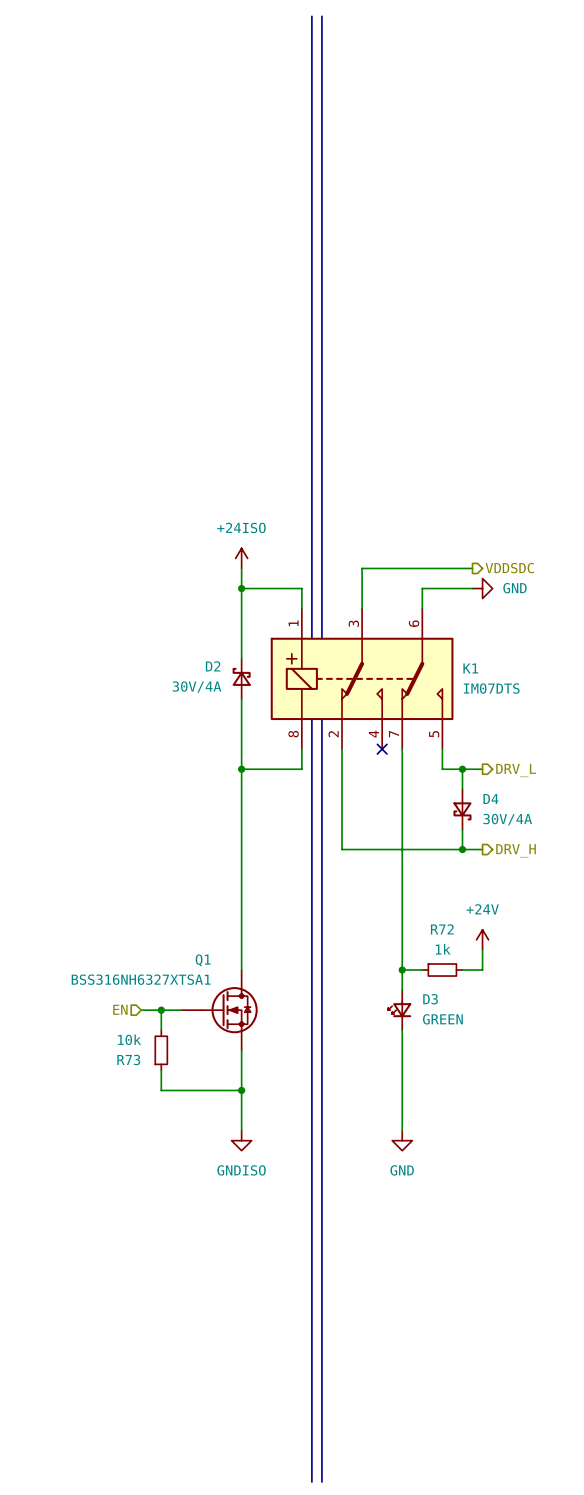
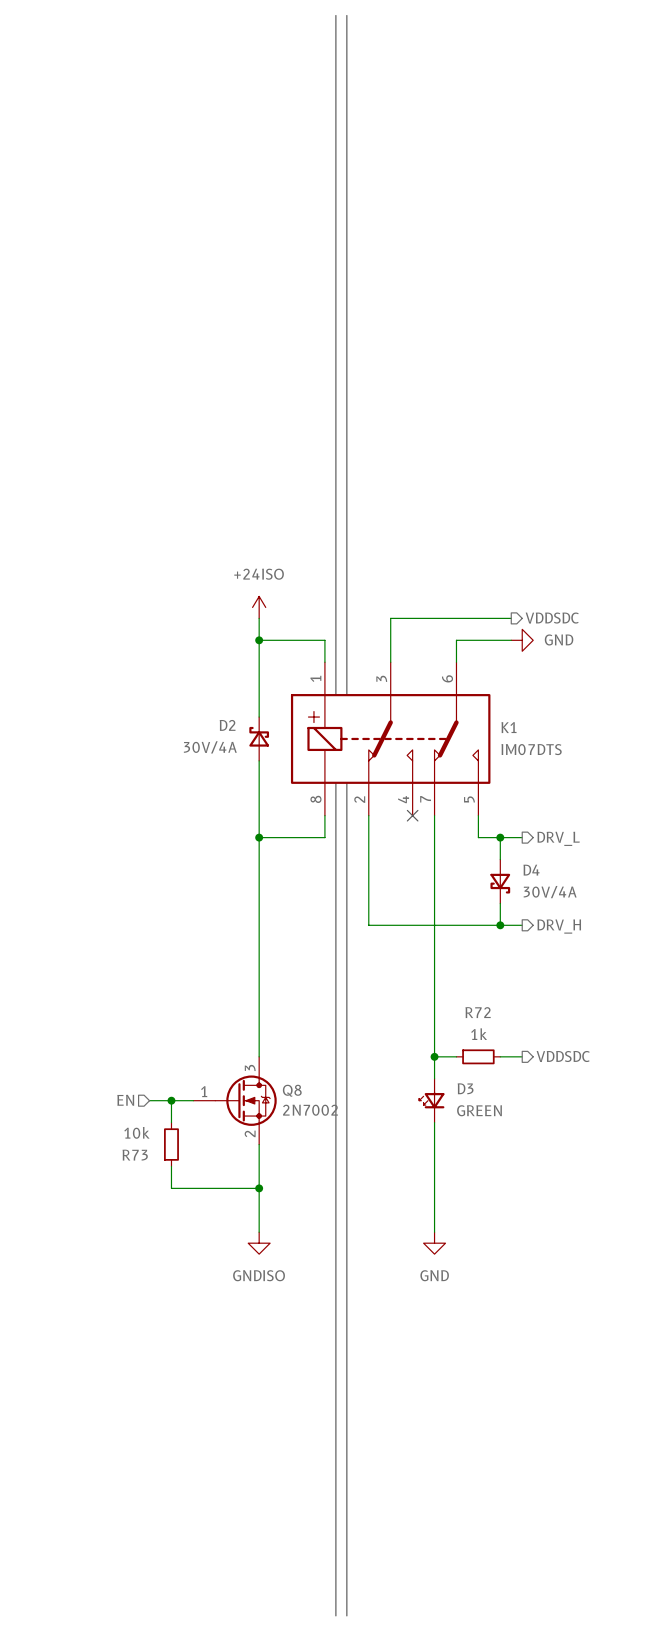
power symbol: +24V (482, 939) -> none
wire: (482, 949) (482, 970) -> none
hierarchical label: none -> VDDSDC (563, 1056)
Q1: BSS316NH6327XTSA1 (219, 1010) -> none
Q8: none -> 2N7002 (235, 1100)

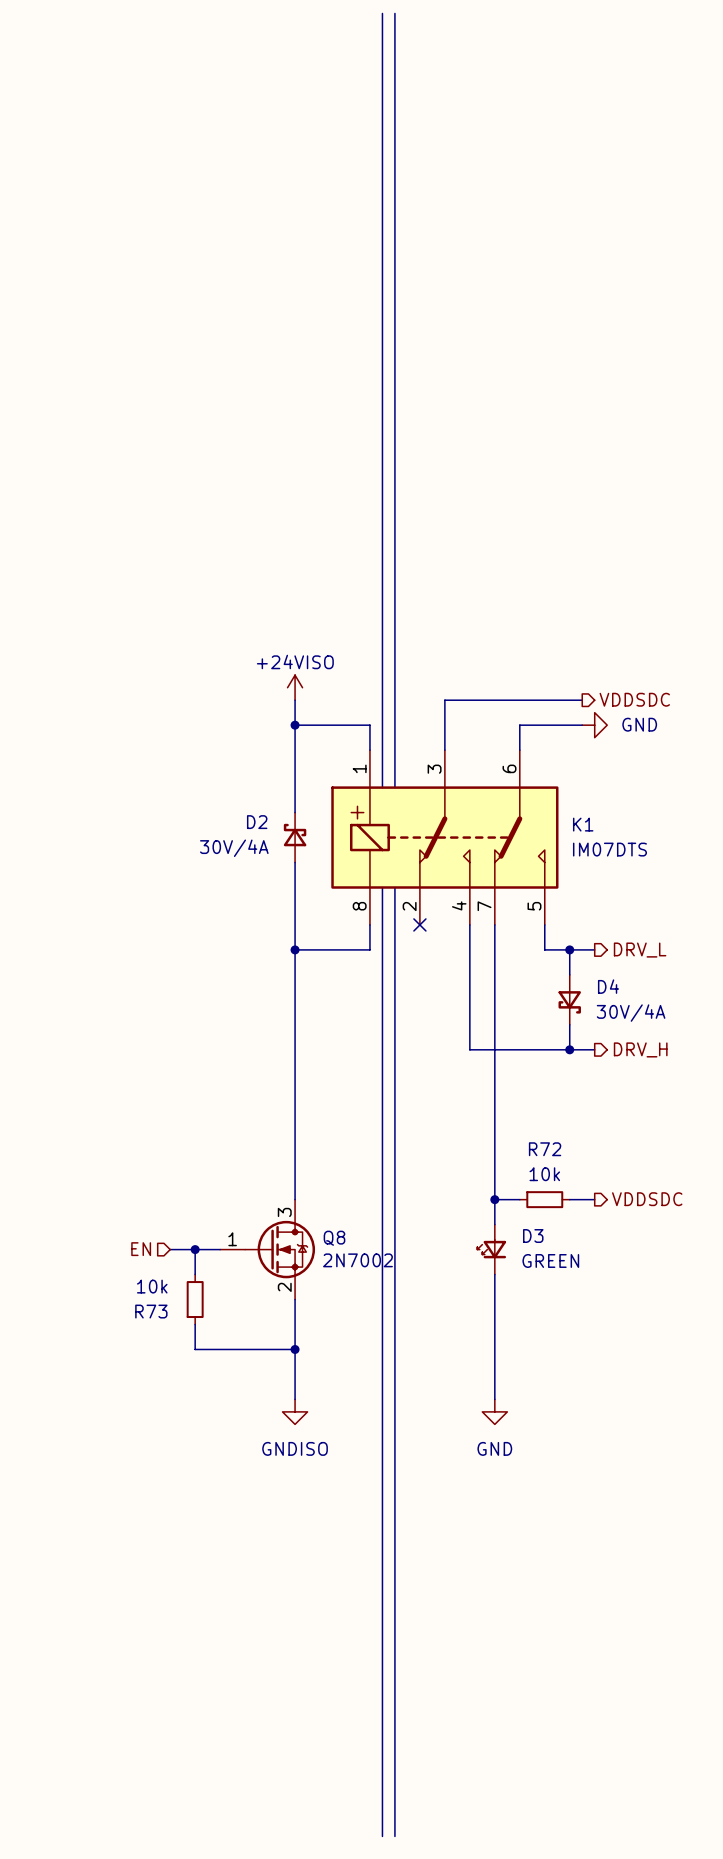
power symbol: +24ISO (259, 607) -> +24VISO (295, 687)
wire: (368, 815) (368, 925) (412, 925) -> (469, 924) (469, 1049)
no-connect mark position: (412, 815) -> (419, 924)
R72 value: 1k (479, 1034) -> 10k (544, 1174)

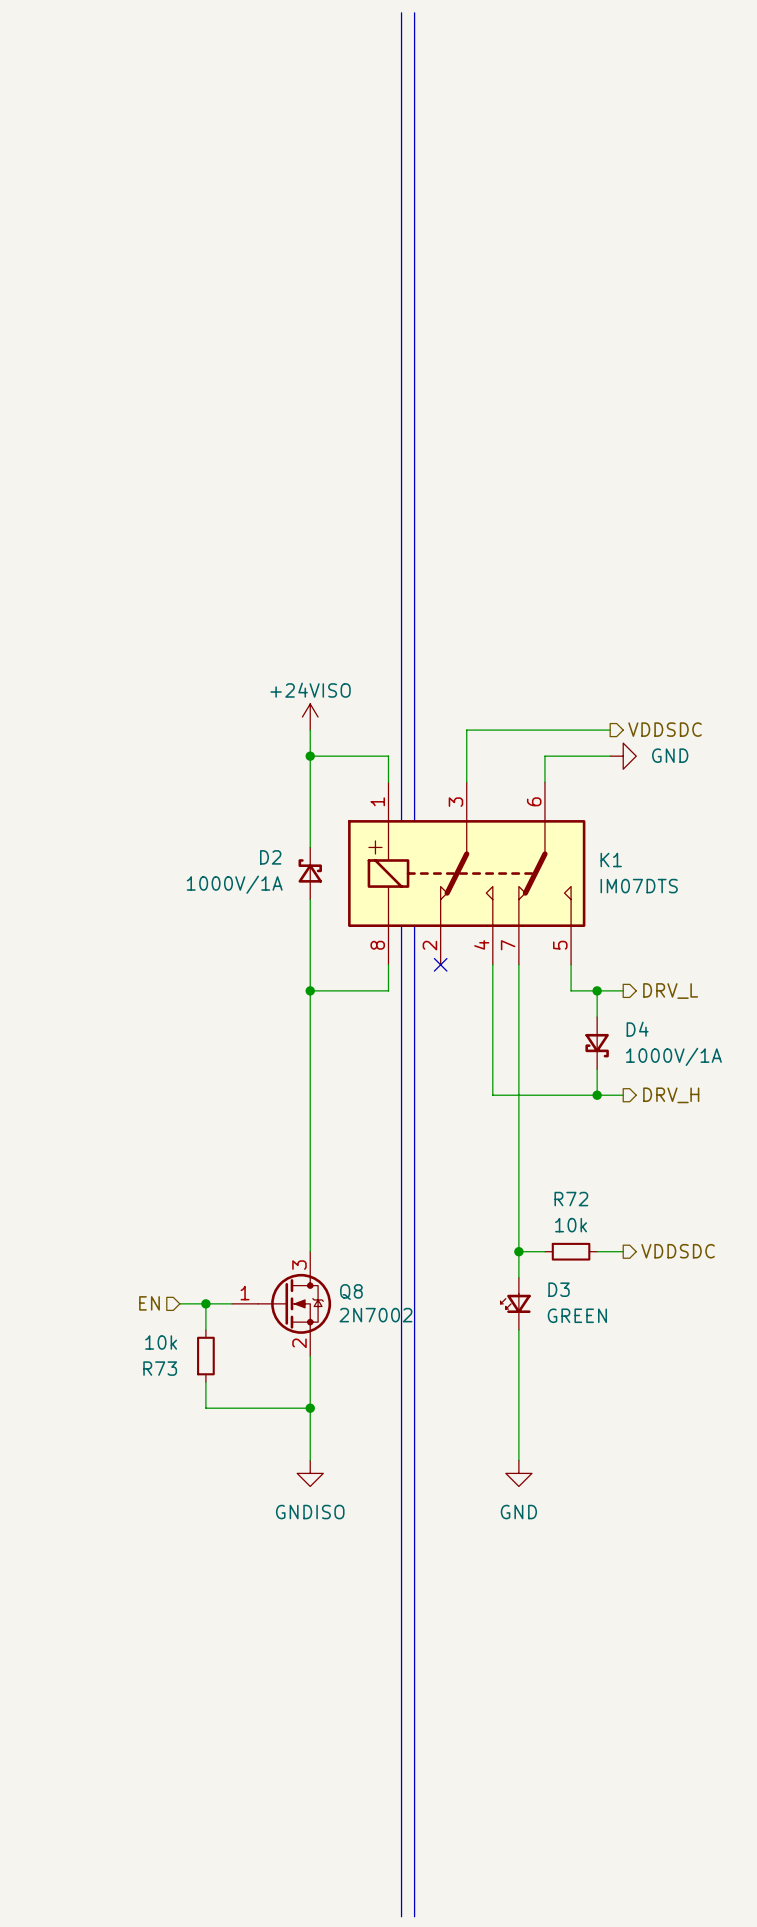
D2 value: 30V/4A (234, 848) -> 1000V/1A (234, 884)
D4 value: 30V/4A (631, 1013) -> 1000V/1A (673, 1056)

